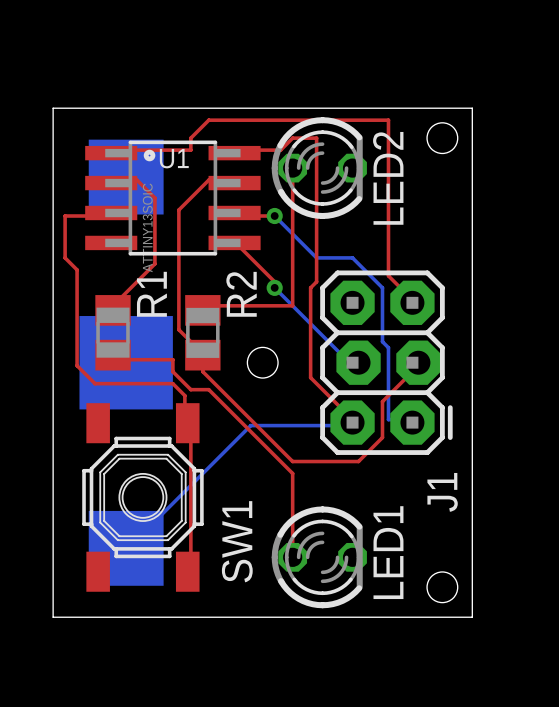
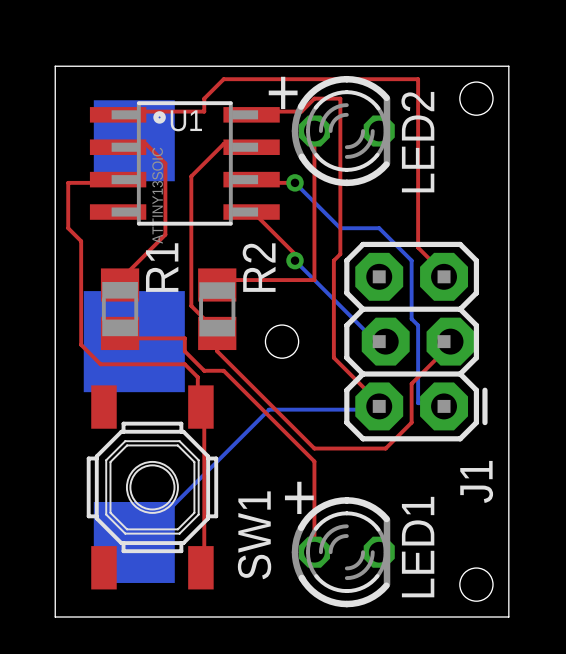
text: none -> + (283, 92)
text: none -> + (299, 497)

